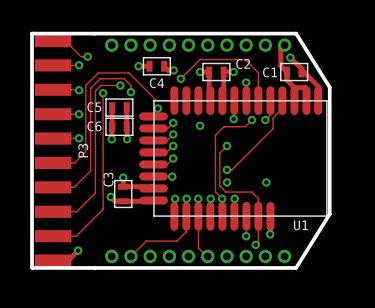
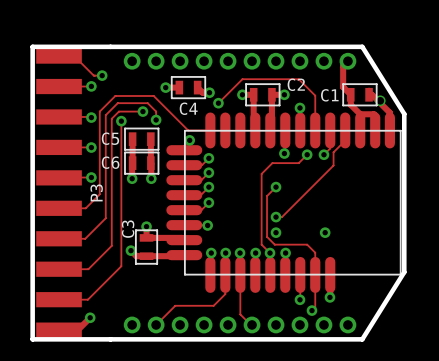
track: (290, 57) (301, 68) -> none
via: (290, 57) -> none
via: none -> (380, 100)
via: (200, 125) -> none
U1 name: U1 (300, 225) -> none

